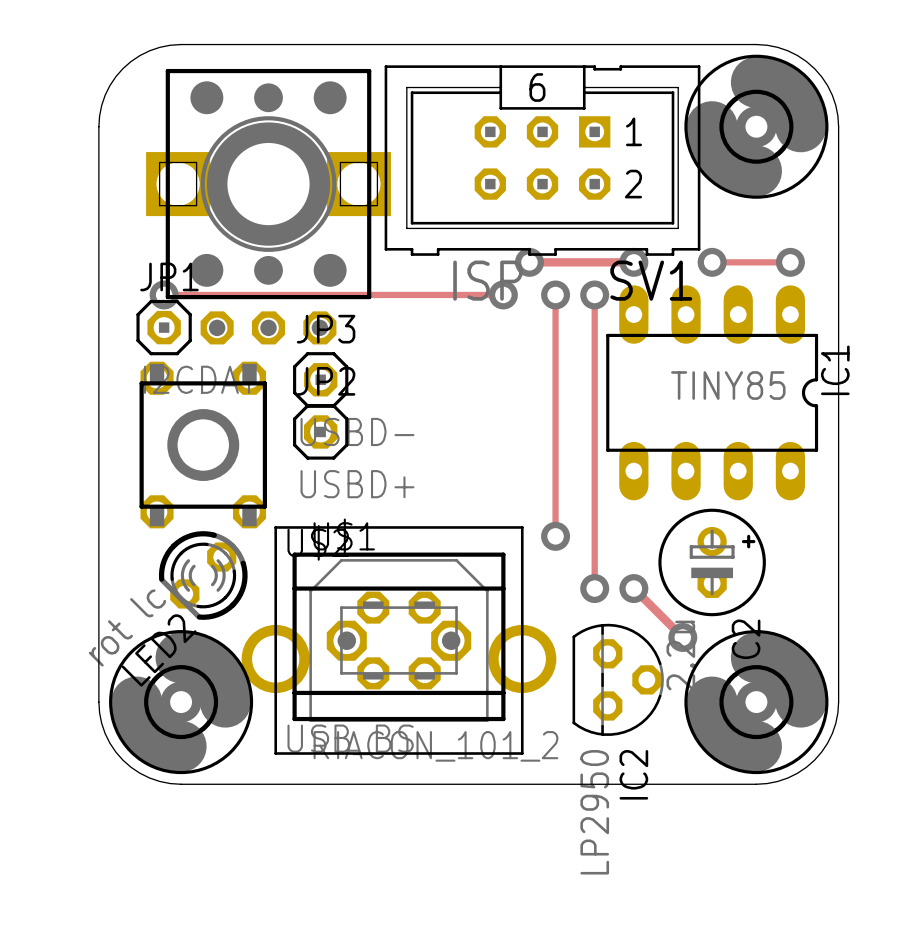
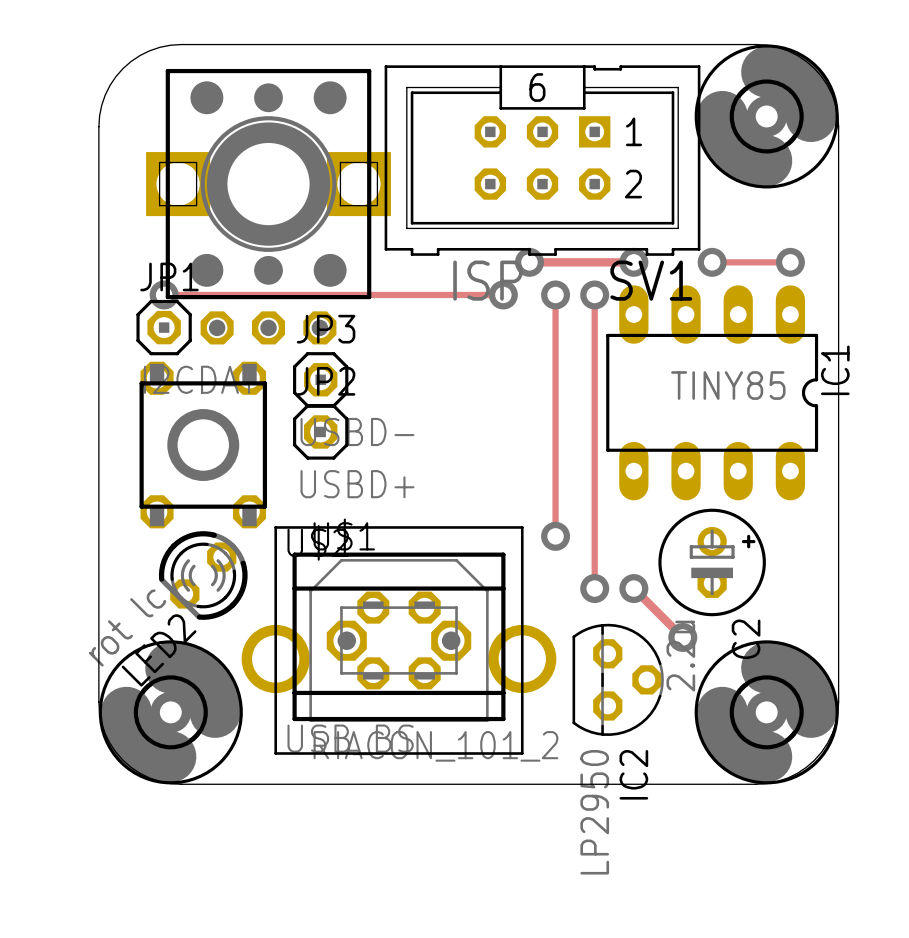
part position: (756, 126) -> (766, 116)
part position: (181, 702) -> (170, 712)
part position: (756, 702) -> (766, 712)

